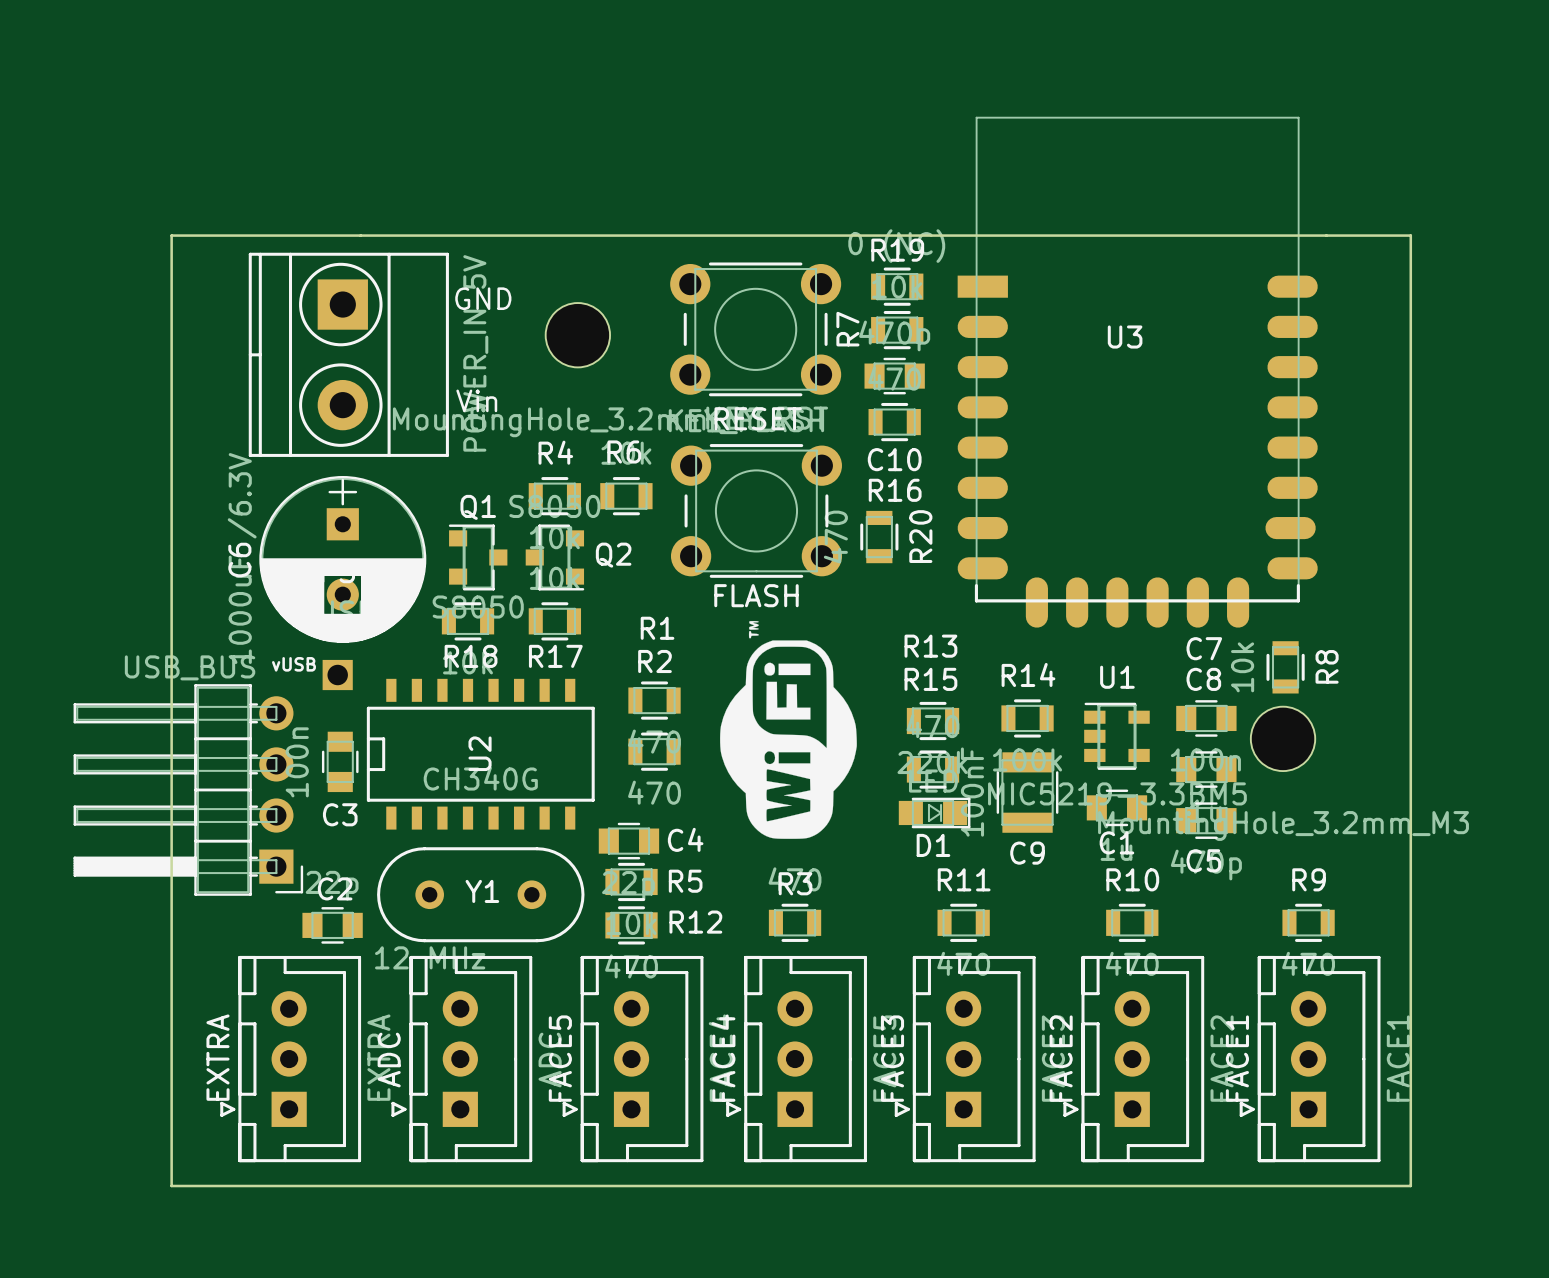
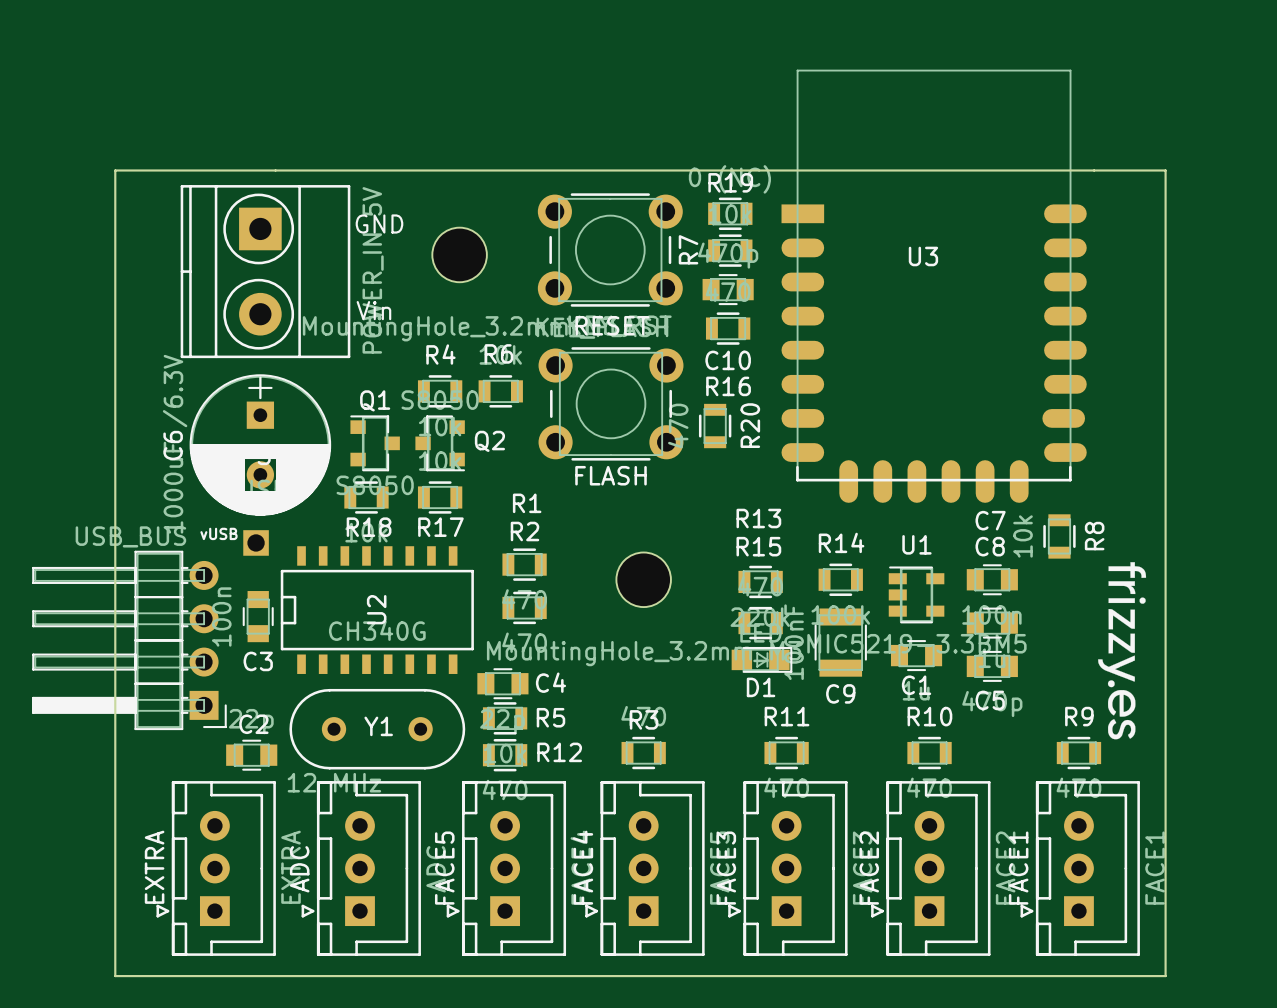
drawing: [720, 621, 857, 839] -> none
drawing: none -> [1098, 562, 1147, 740]
part position: (1283, 738) -> (643, 579)

